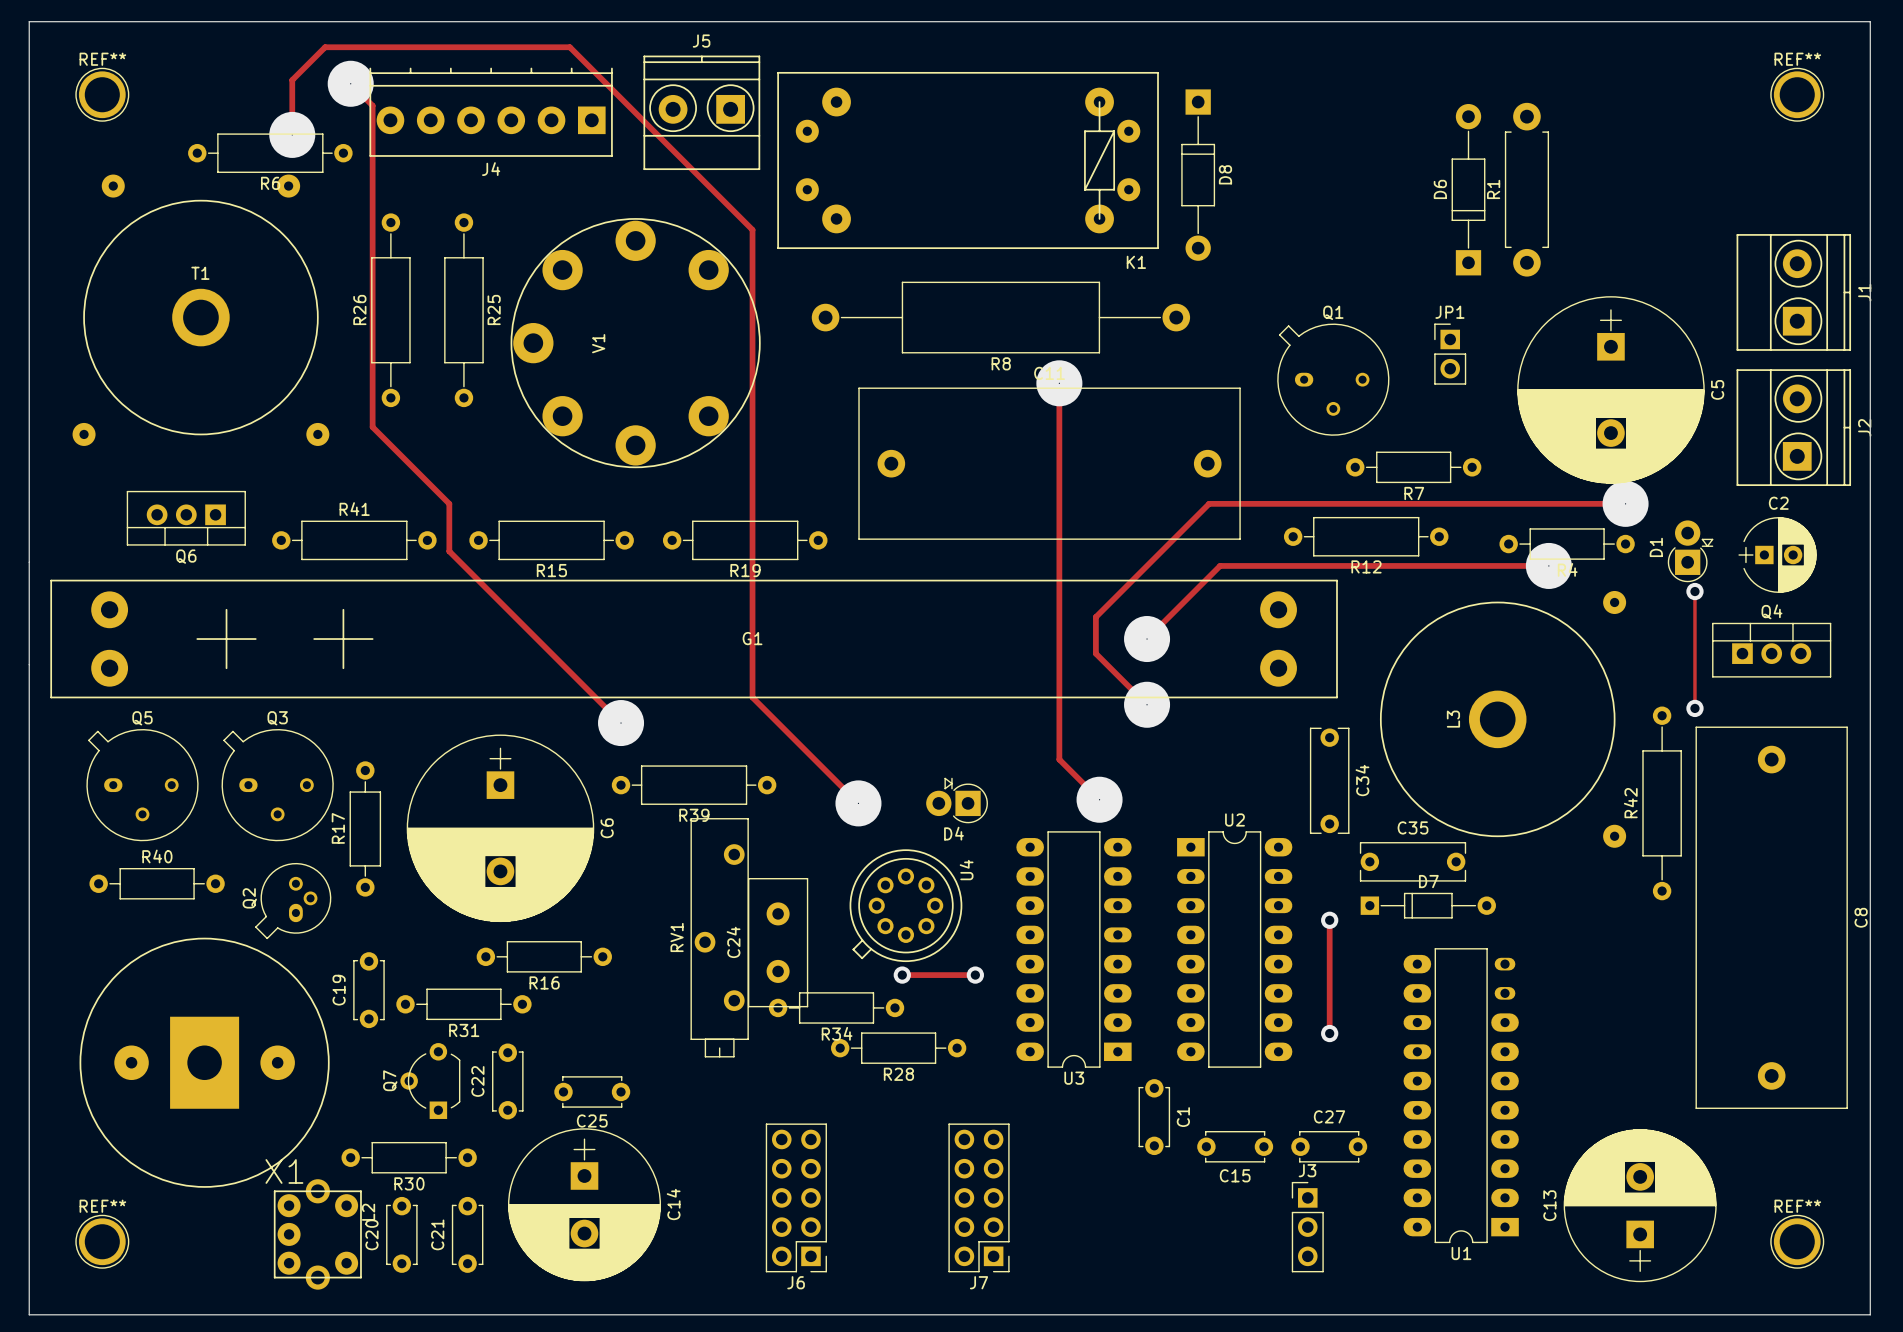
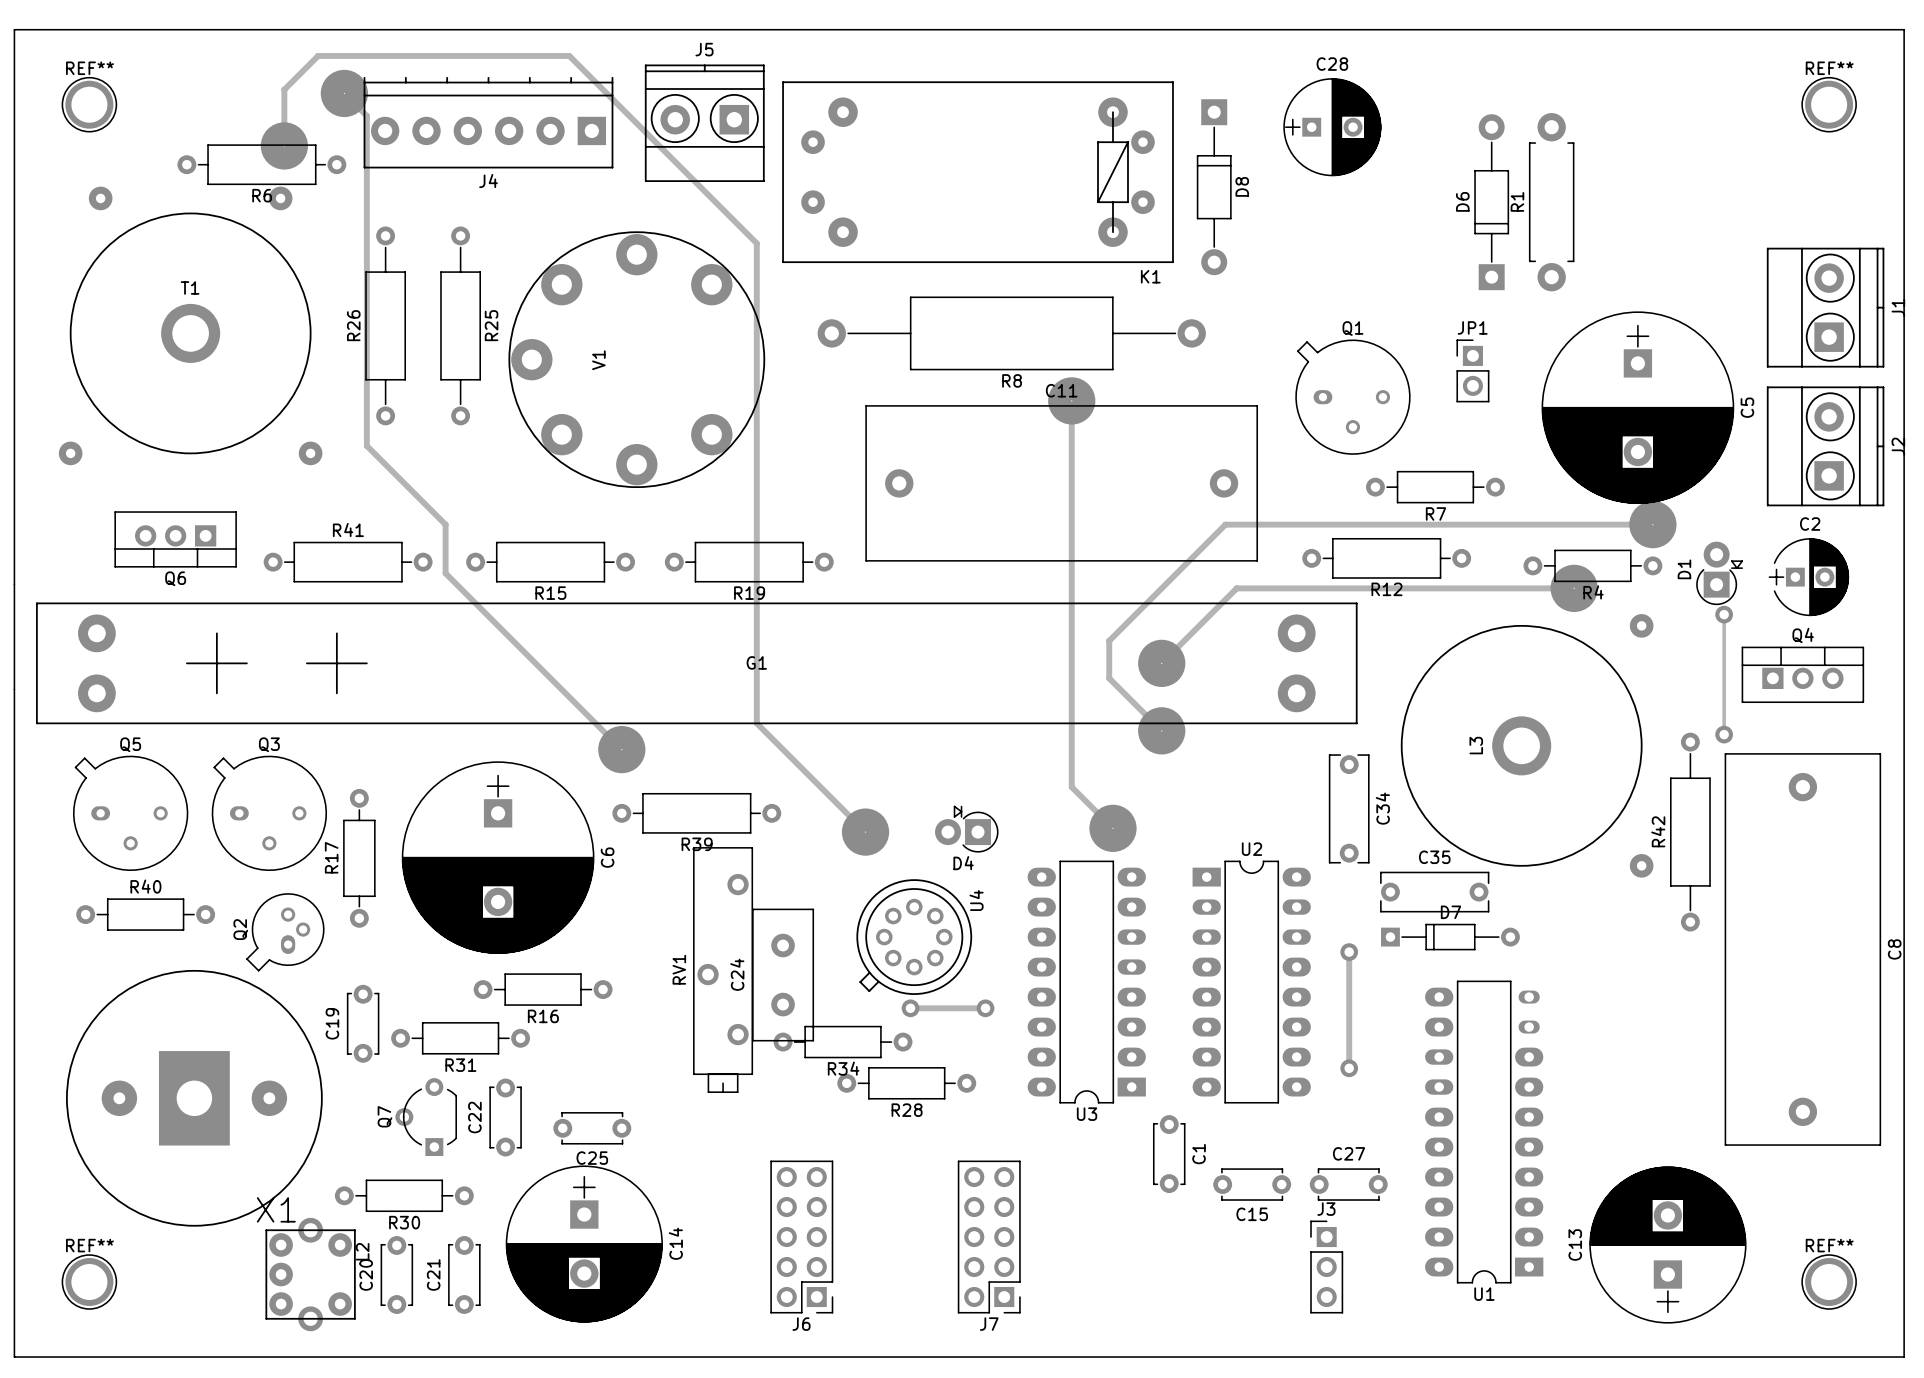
C28: none -> (1332, 127)

